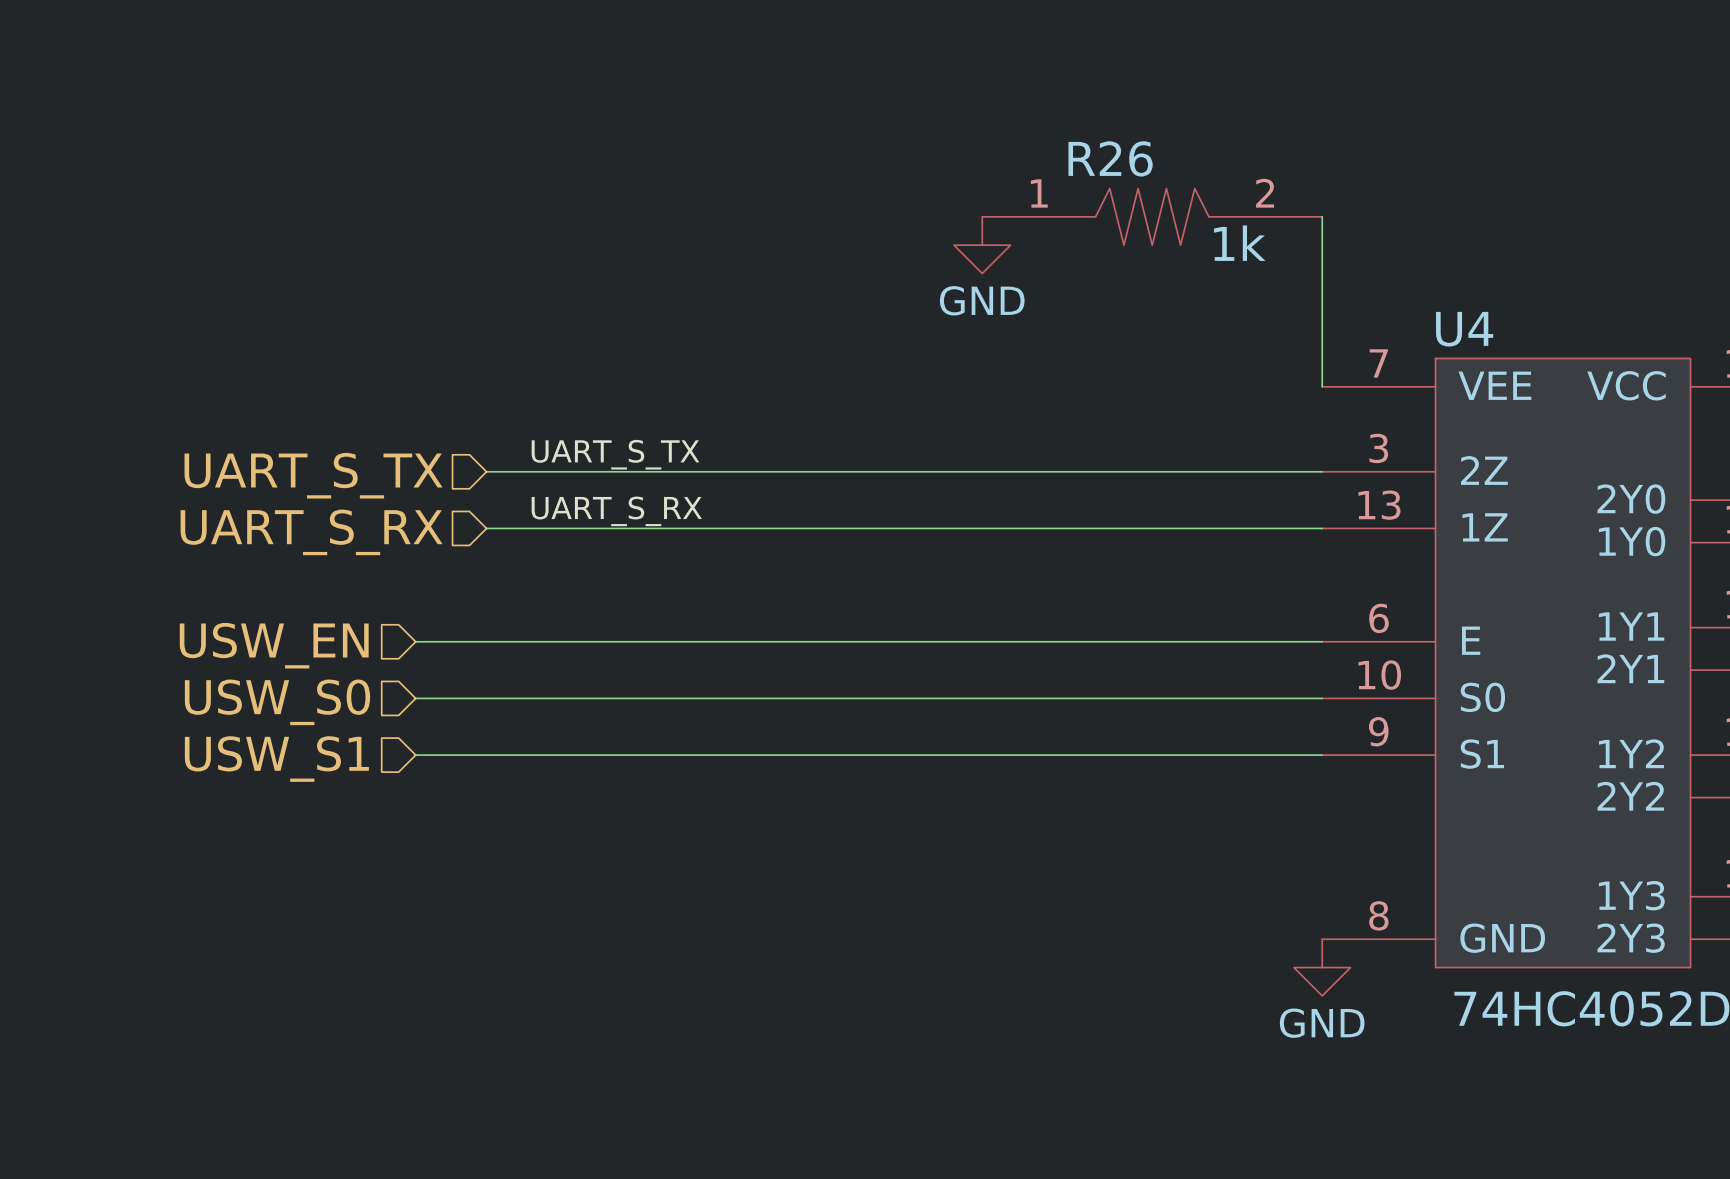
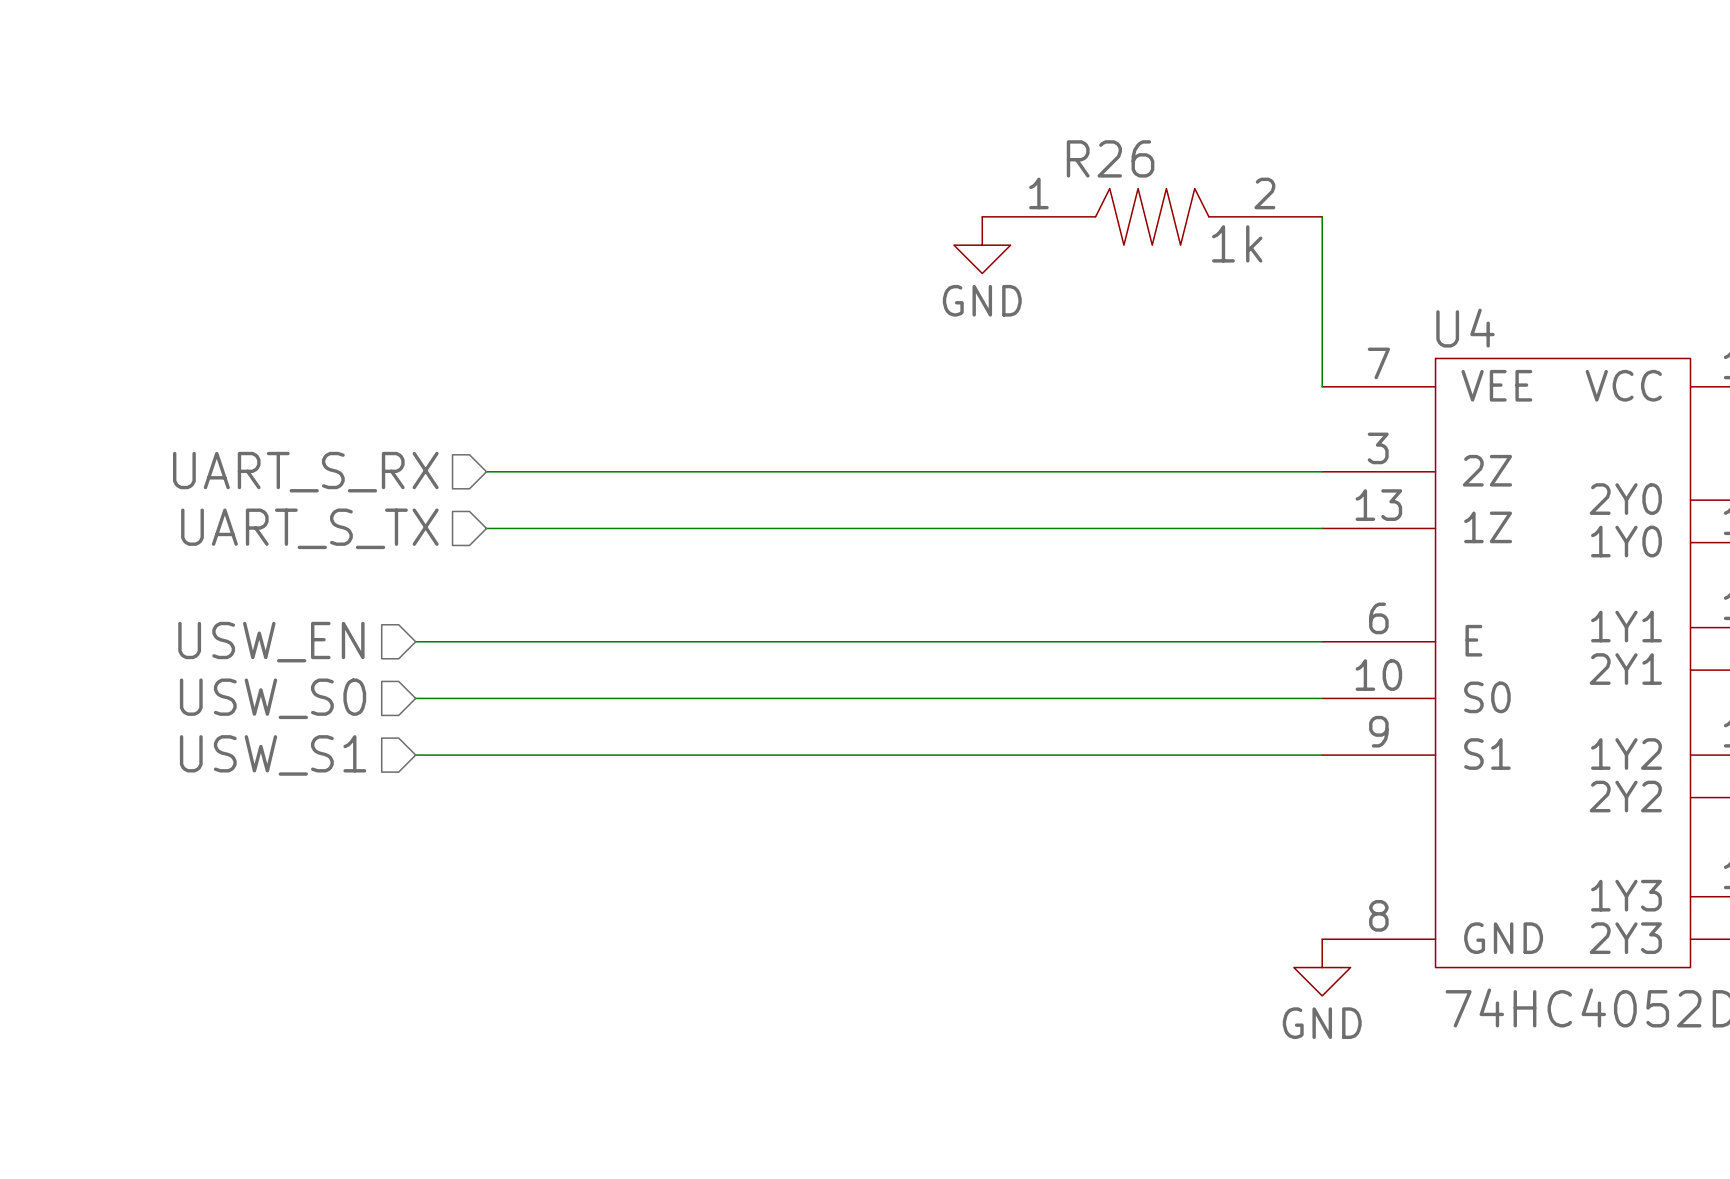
label: UART_S_TX (615, 454) -> none
hierarchical label: UART_S_TX (313, 475) -> UART_S_RX (305, 472)
label: UART_S_RX (616, 511) -> none
hierarchical label: UART_S_RX (311, 532) -> UART_S_TX (309, 528)

